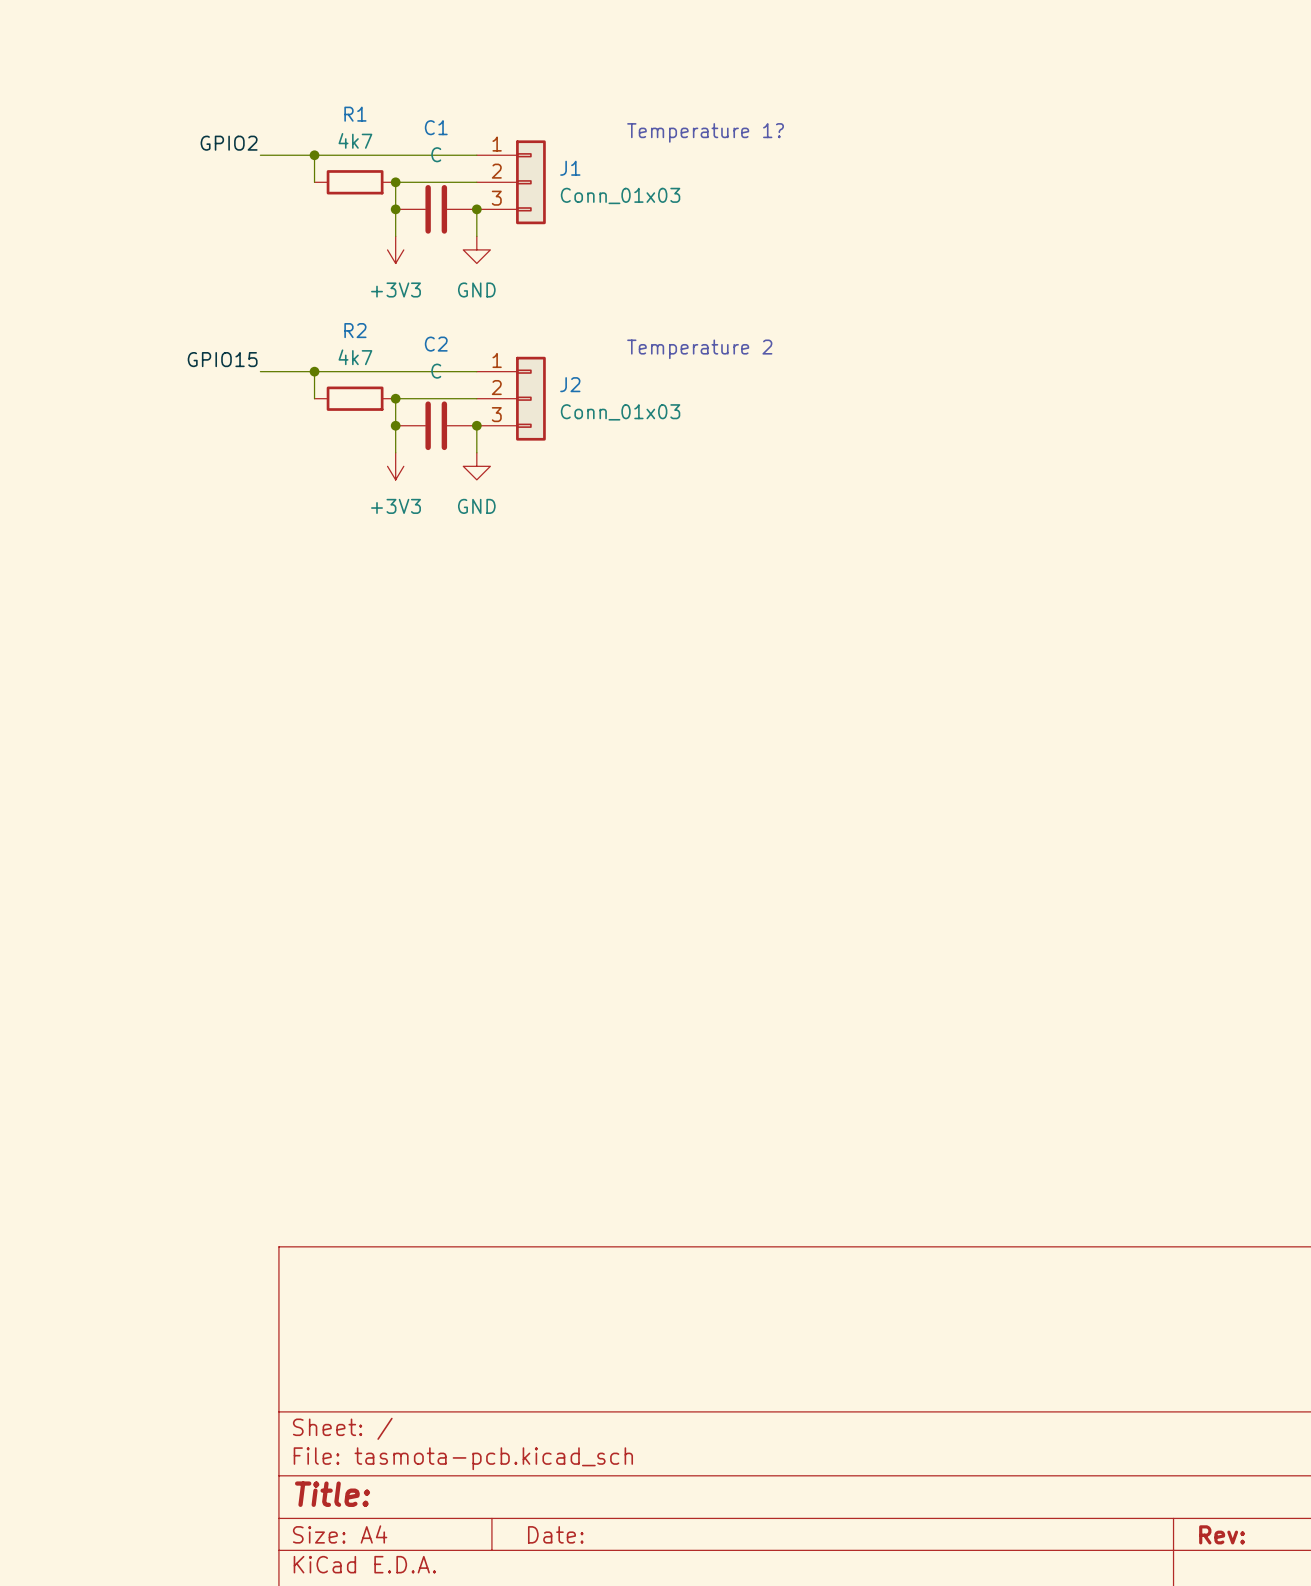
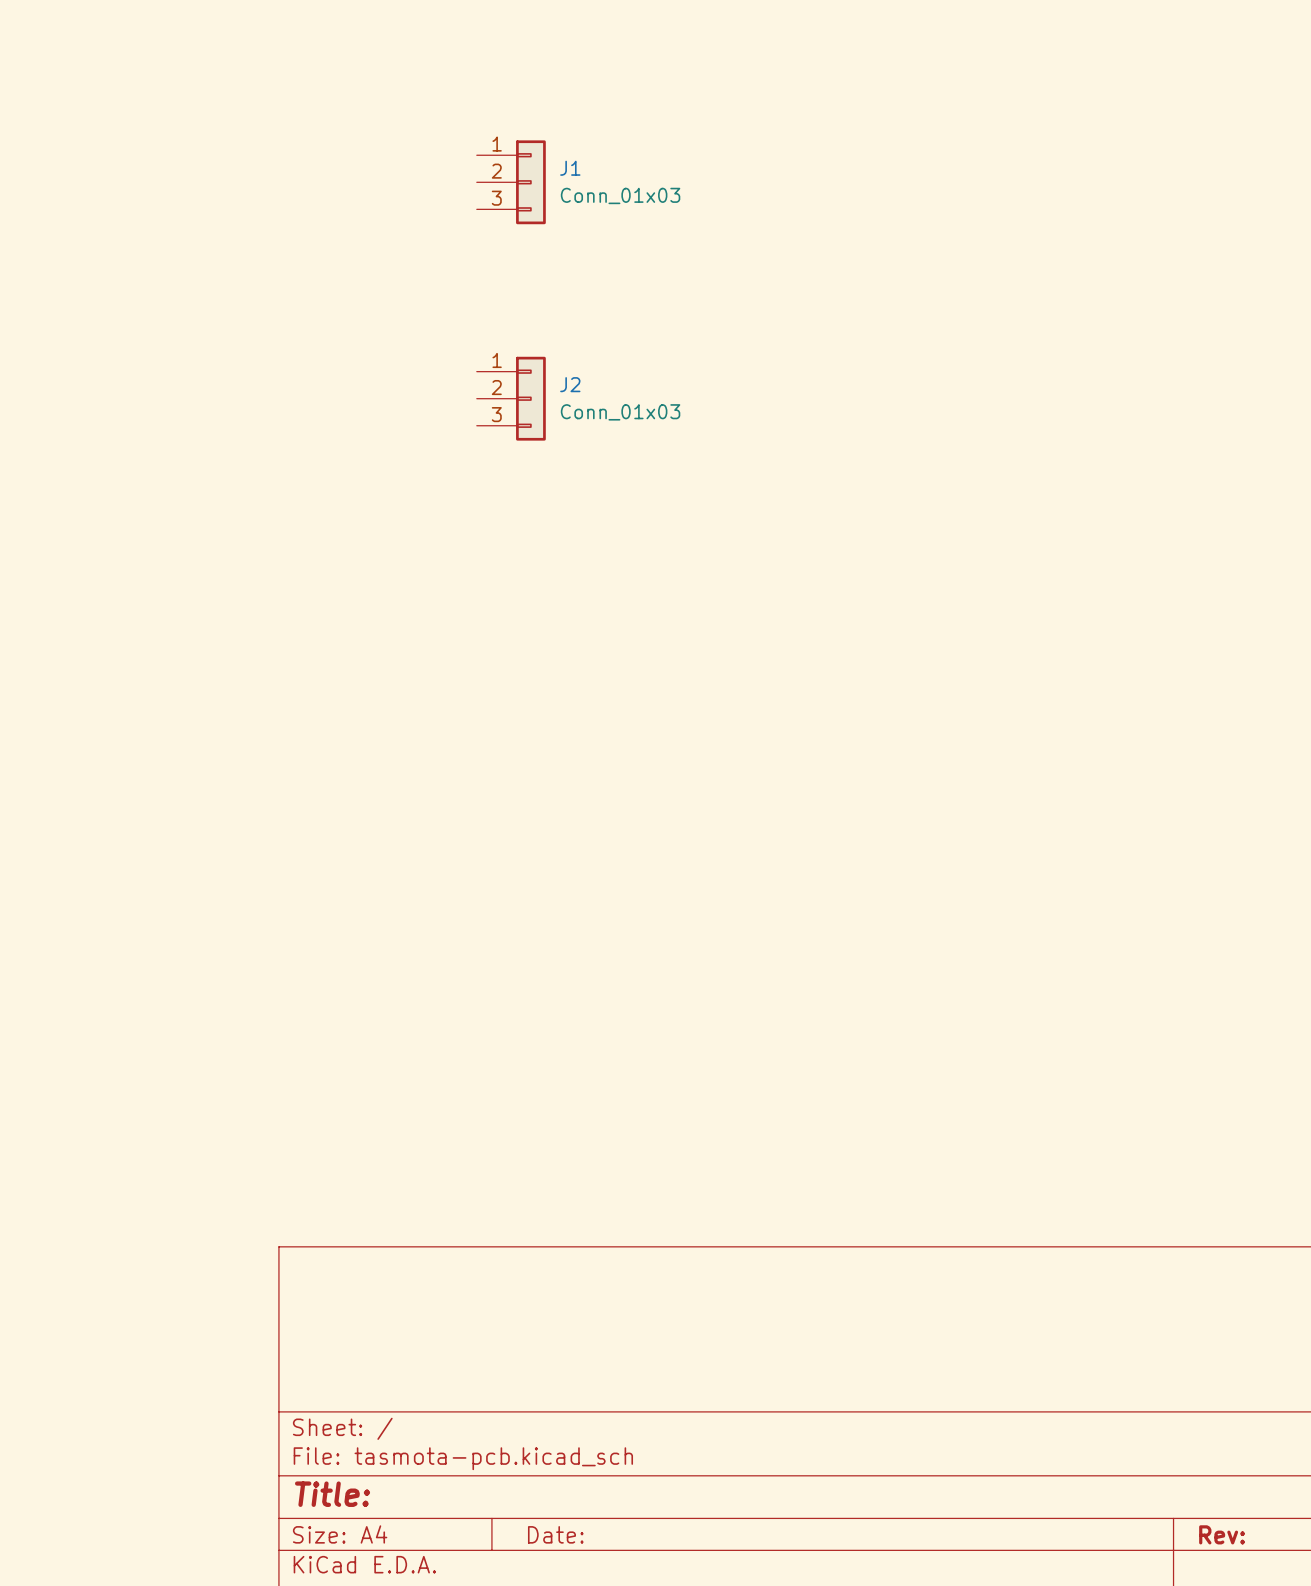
text: Temperature 1? (705, 132) -> none
label: GPIO2 (229, 143) -> none
wire: (260, 155) (476, 155) -> none
wire: (314, 155) (314, 182) -> none
junction: (314, 155) -> none
R1: 4k7 (355, 182) -> none
junction: (395, 182) -> none
wire: (476, 182) (395, 182) (395, 236) -> none
junction: (395, 209) -> none
C1: C (436, 209) -> none
wire: (476, 209) (476, 236) -> none
junction: (476, 209) -> none
power symbol: +3V3 (395, 249) -> none
power symbol: GND (476, 249) -> none
text: Temperature 2 (699, 349) -> none
label: GPIO15 (222, 359) -> none
wire: (260, 371) (476, 371) -> none
wire: (314, 371) (314, 398) -> none
junction: (314, 371) -> none
R2: 4k7 (355, 398) -> none
junction: (395, 398) -> none
wire: (476, 398) (395, 398) (395, 452) -> none
junction: (395, 425) -> none
C2: C (436, 425) -> none
wire: (476, 425) (476, 452) -> none
junction: (476, 425) -> none
power symbol: +3V3 (395, 466) -> none
power symbol: GND (476, 466) -> none

